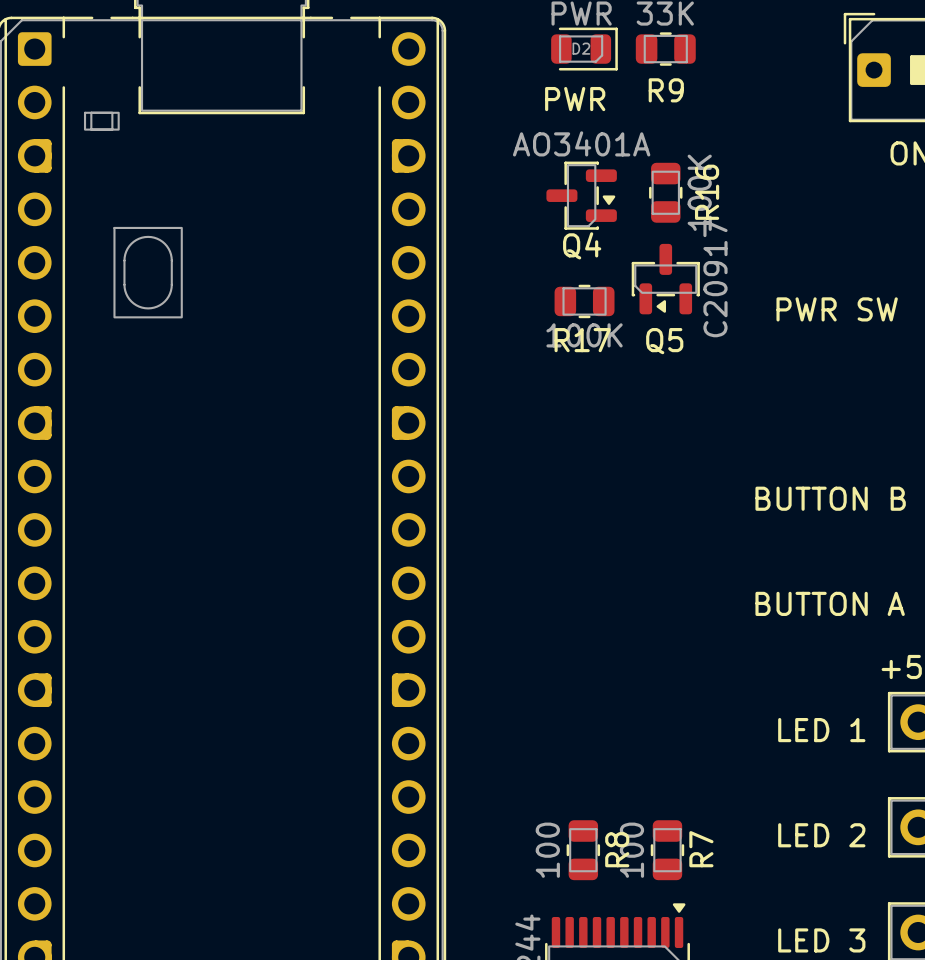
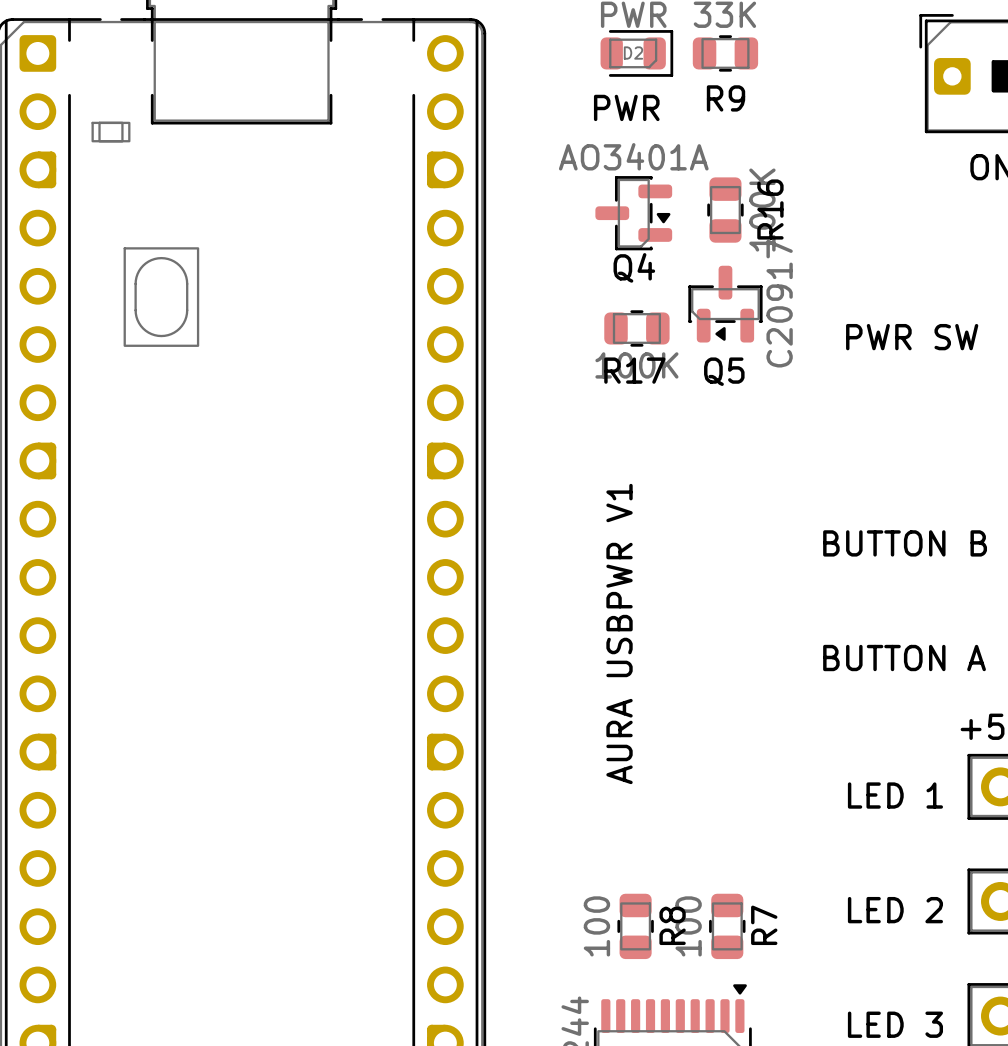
text: none -> AURA USBPWR V1 (619, 634)

